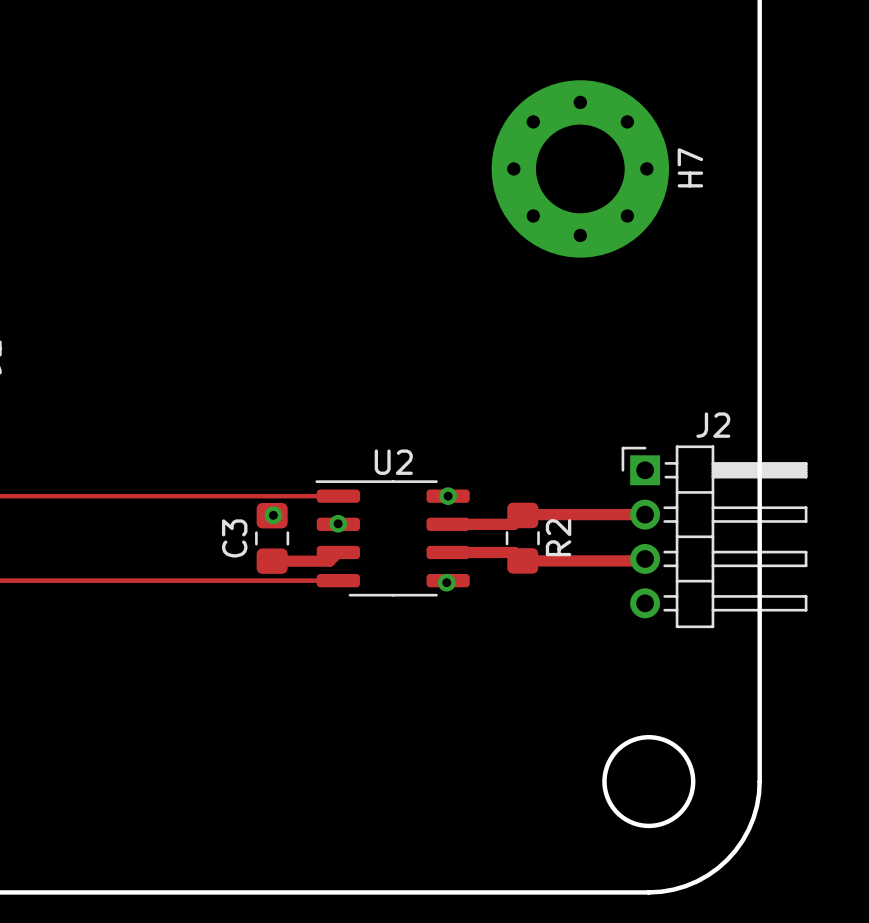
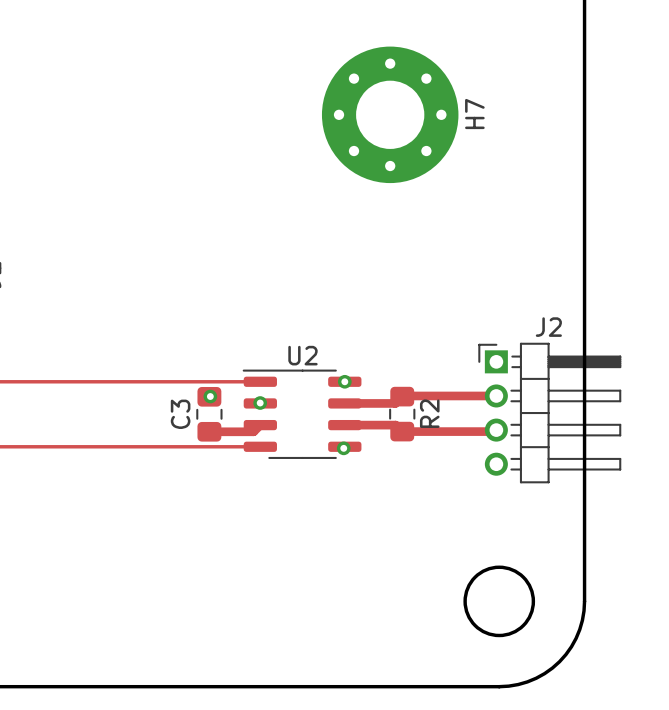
H7 position: (580, 168) -> (390, 114)

